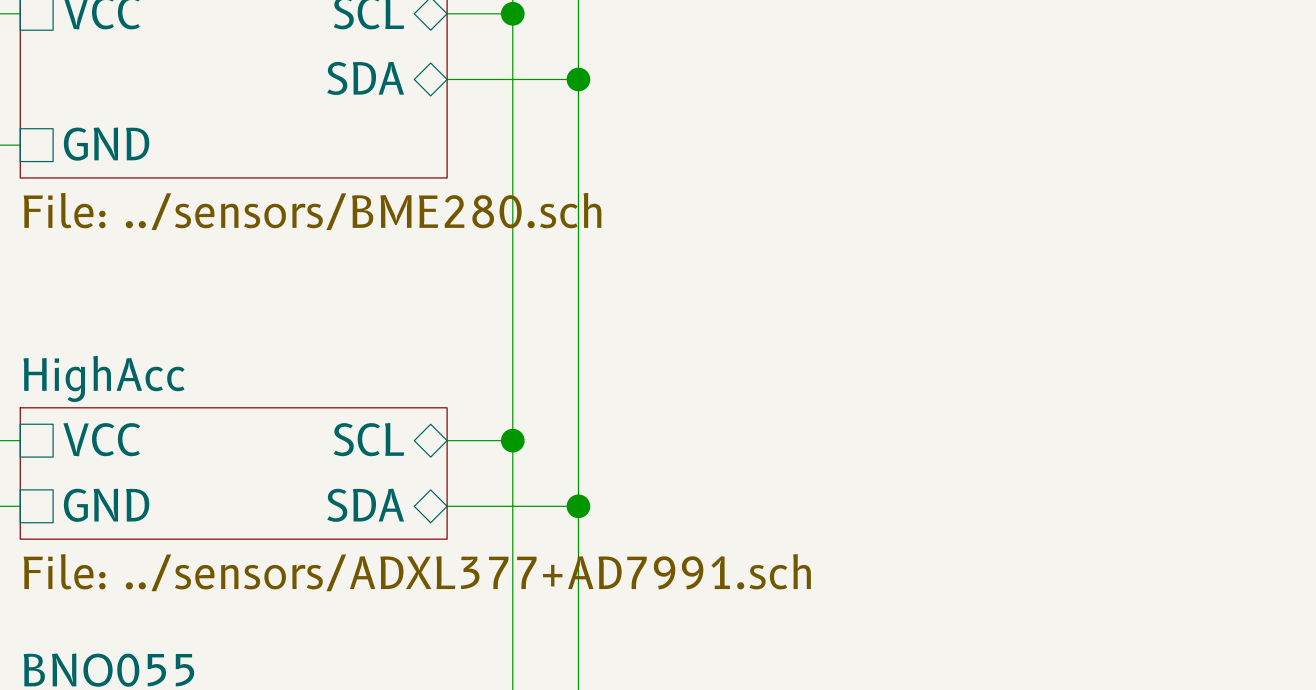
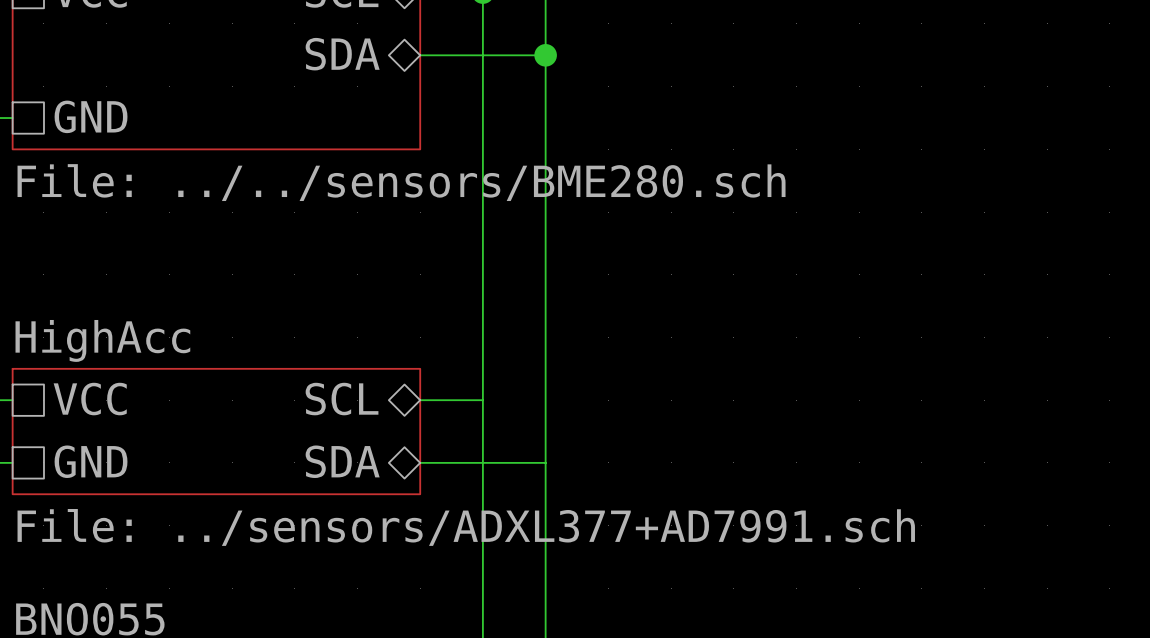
sheet value: File: ../sensors/BME280.sch (312, 211) -> File: ../../sensors/BME280.sch (401, 182)
junction: (512, 440) -> none
junction: (578, 506) -> none

